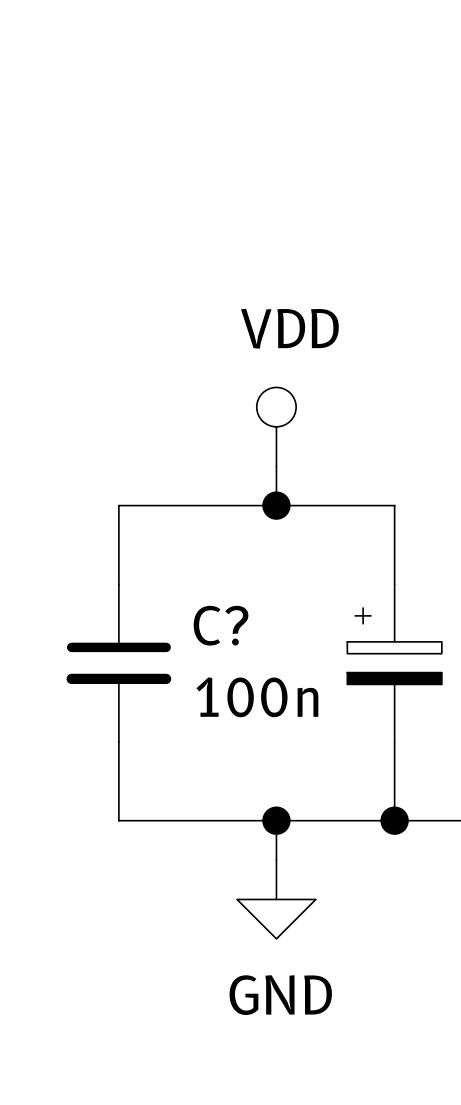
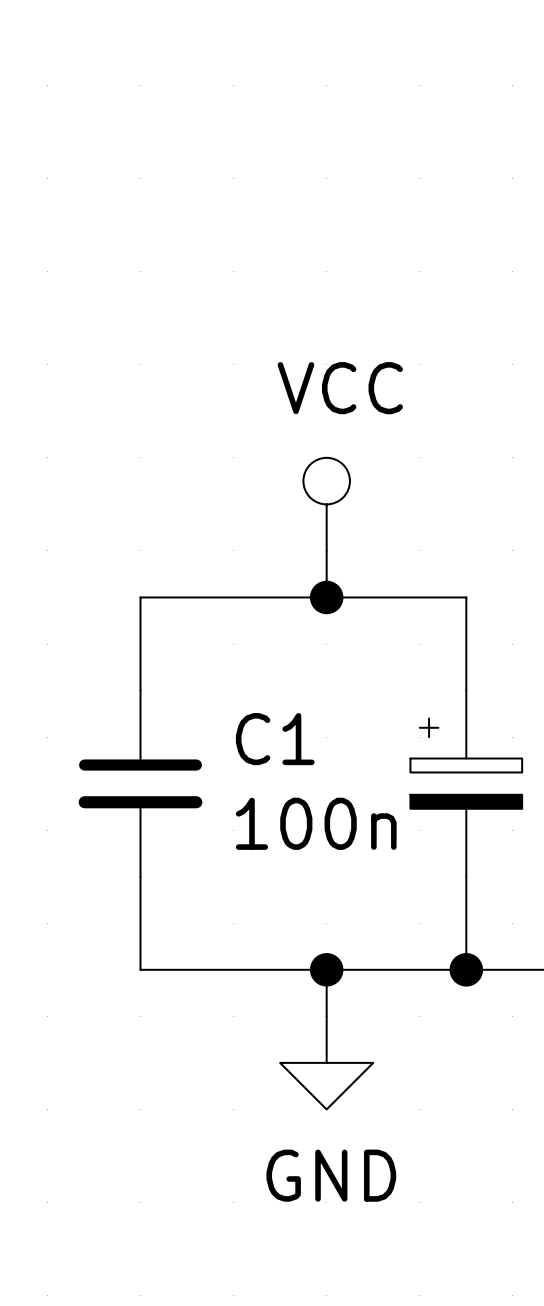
power symbol: VDD (276, 426) -> VCC (326, 504)
C? name: C? (221, 625) -> C1 (275, 739)

